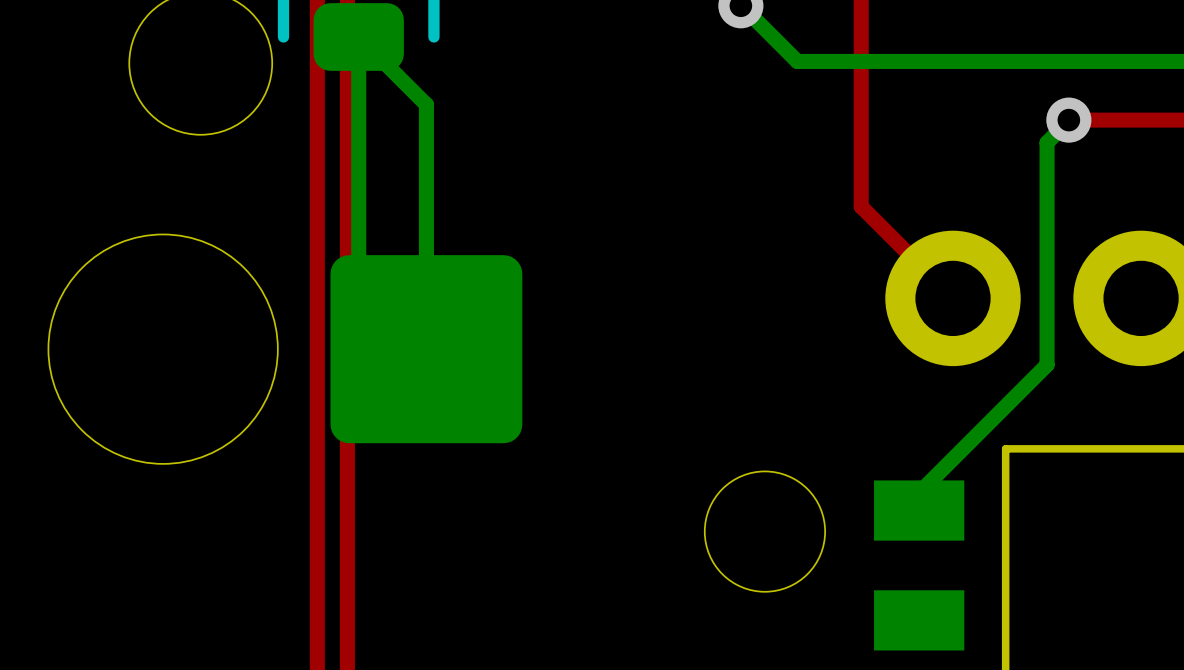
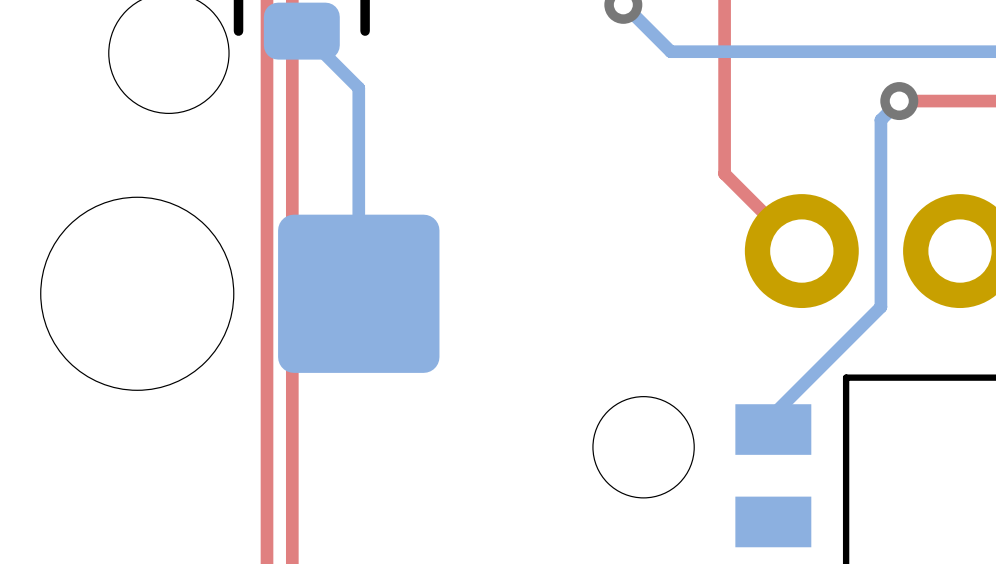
bottom track: (358, 37) (358, 281) (426, 349) -> none

